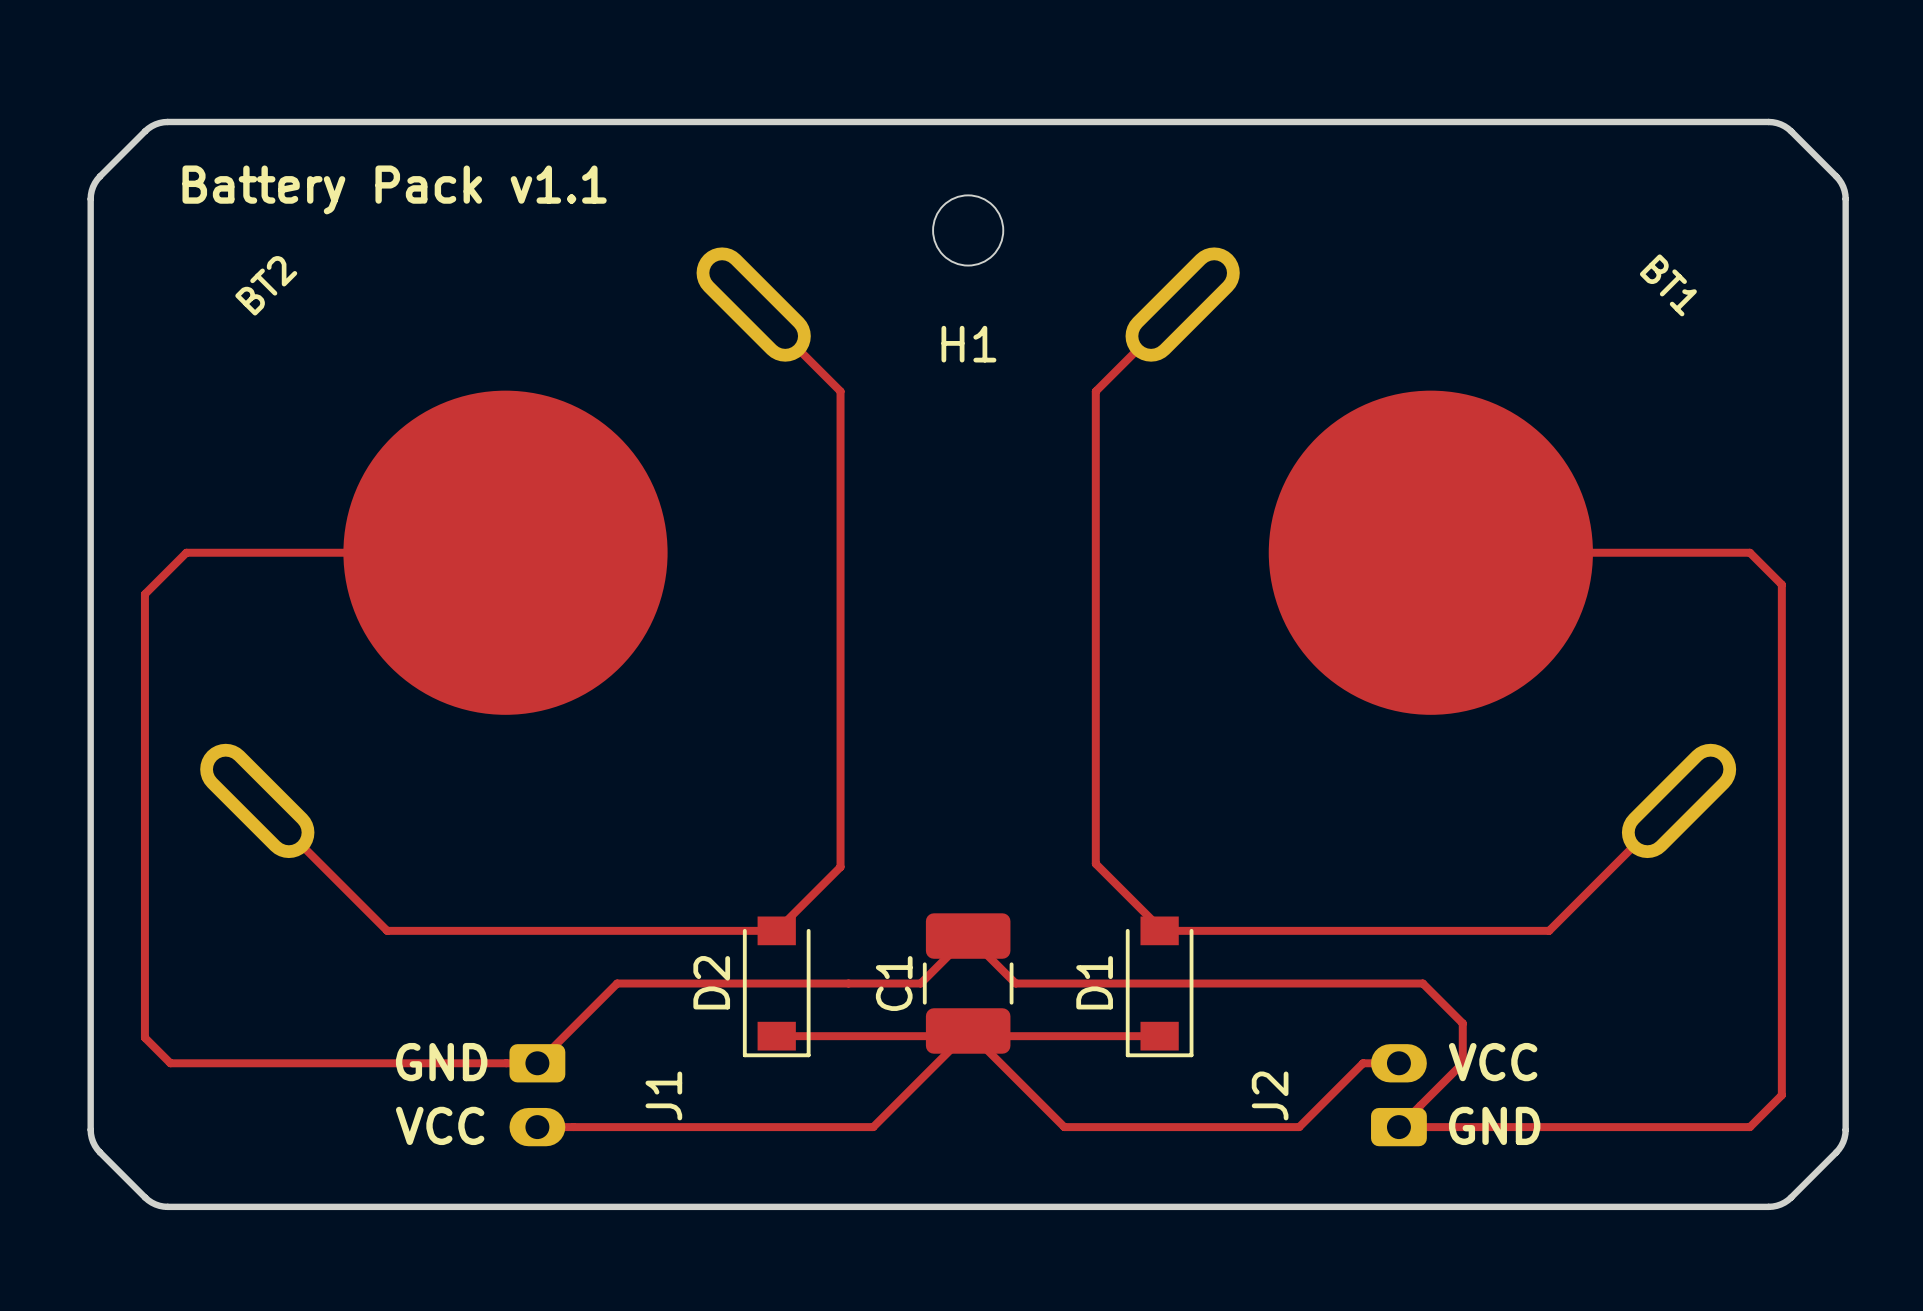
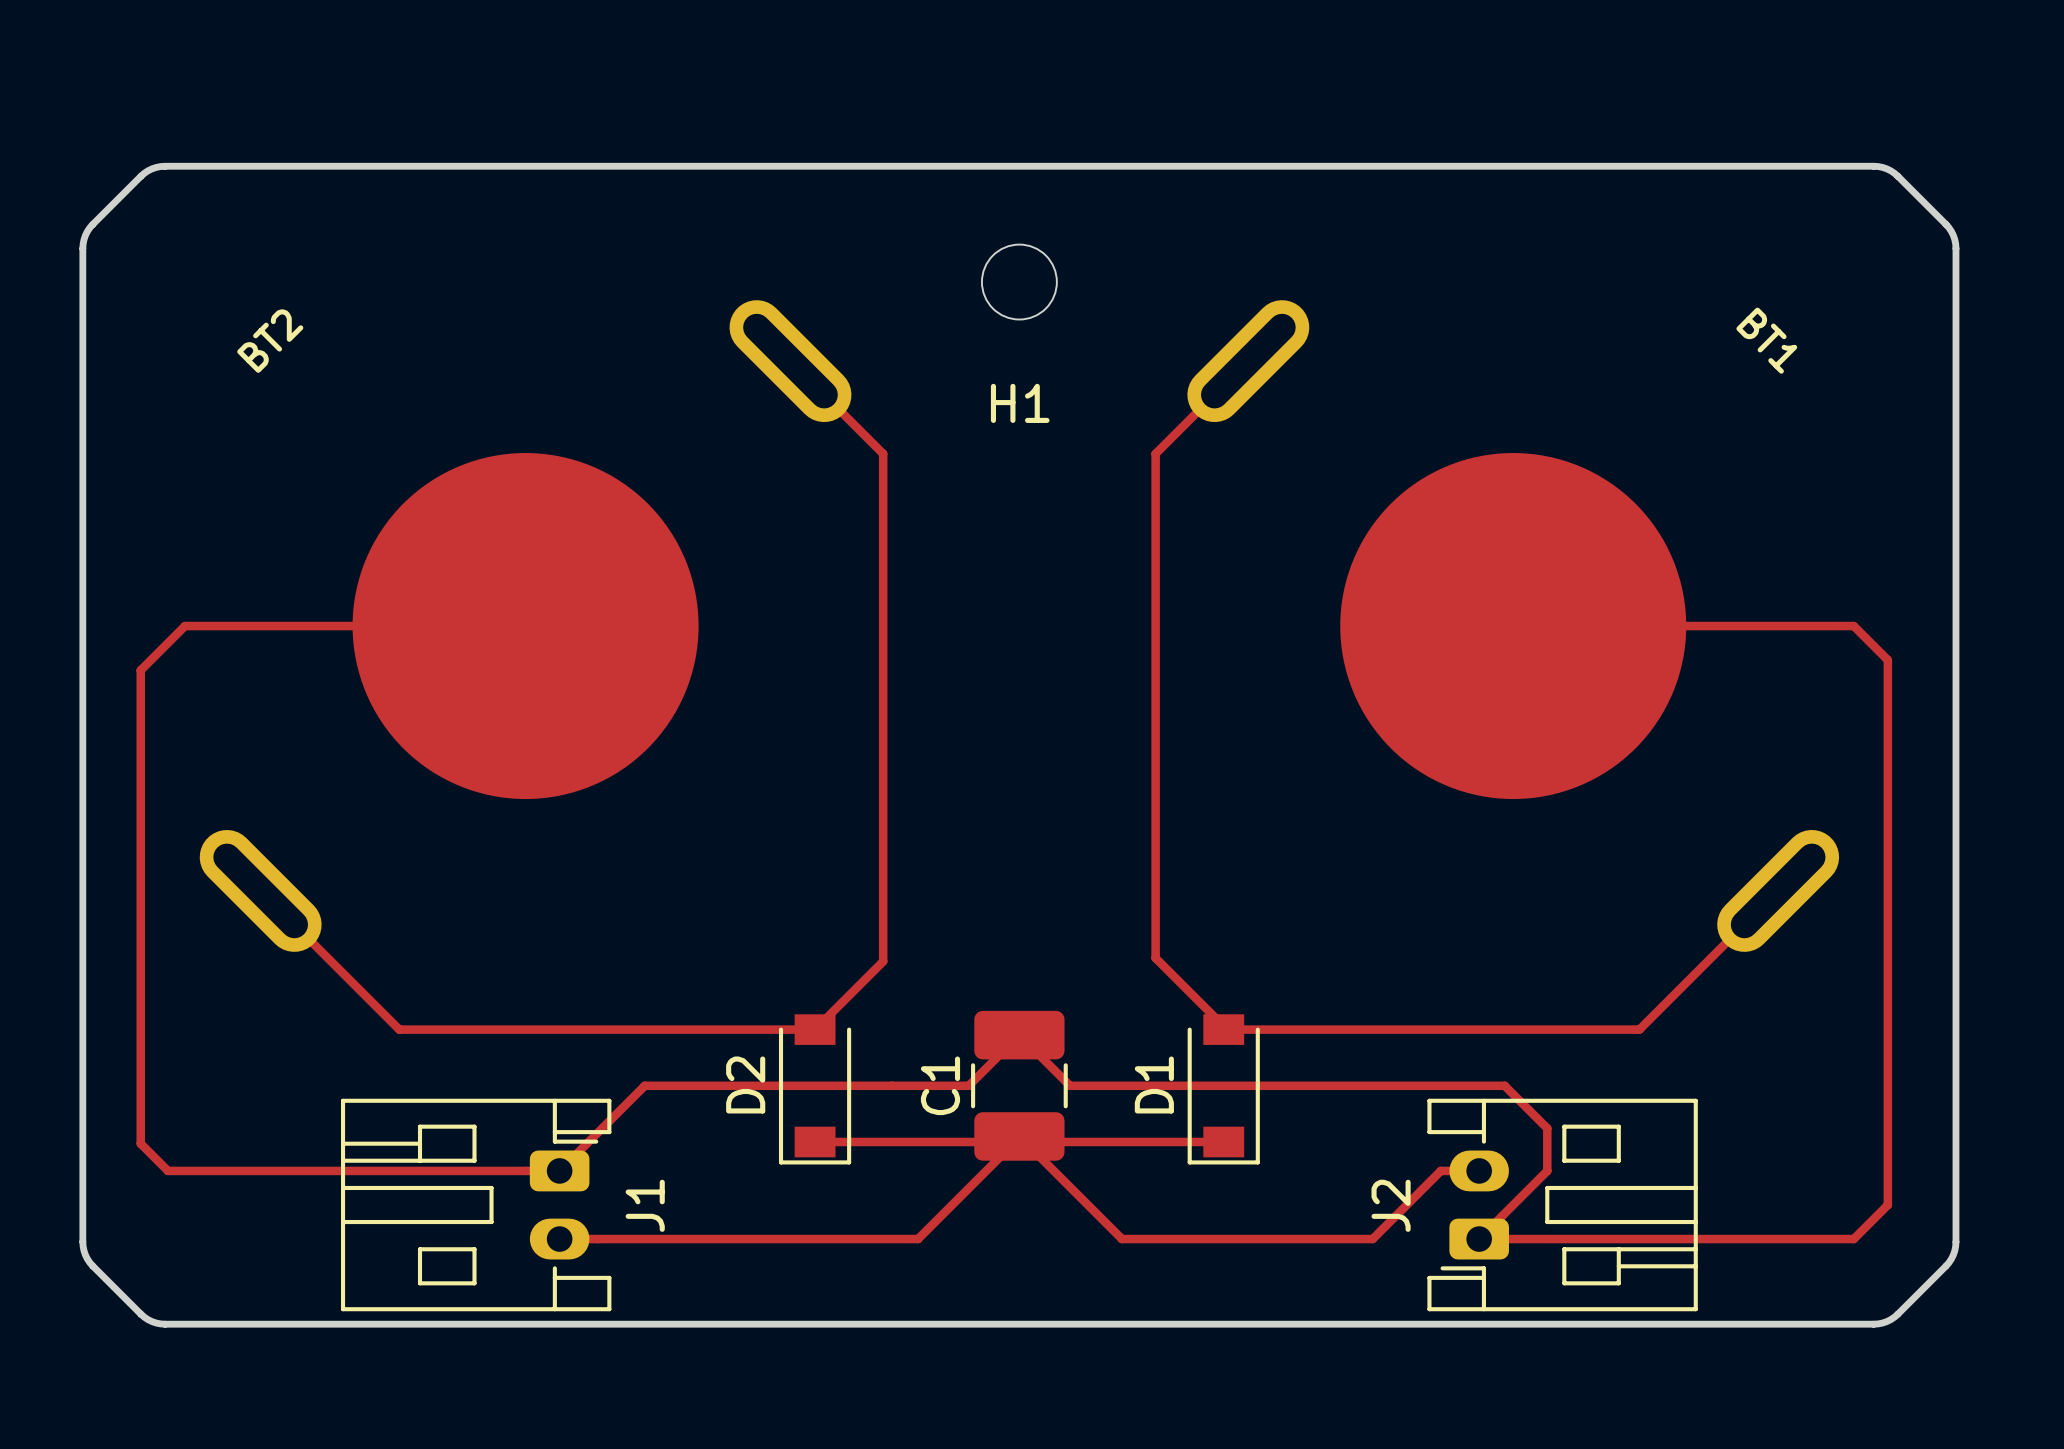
text: Battery Pack v1.1 (394, 189) -> none
J1 footprint: [509, 1044, 566, 1147] -> [340, 1098, 612, 1312]
J2 footprint: [1371, 1044, 1427, 1147] -> [1427, 1098, 1698, 1312]
text: GND (441, 1062) -> none
text: VCC (1493, 1062) -> none
text: VCC (440, 1125) -> none
text: GND (1494, 1125) -> none

